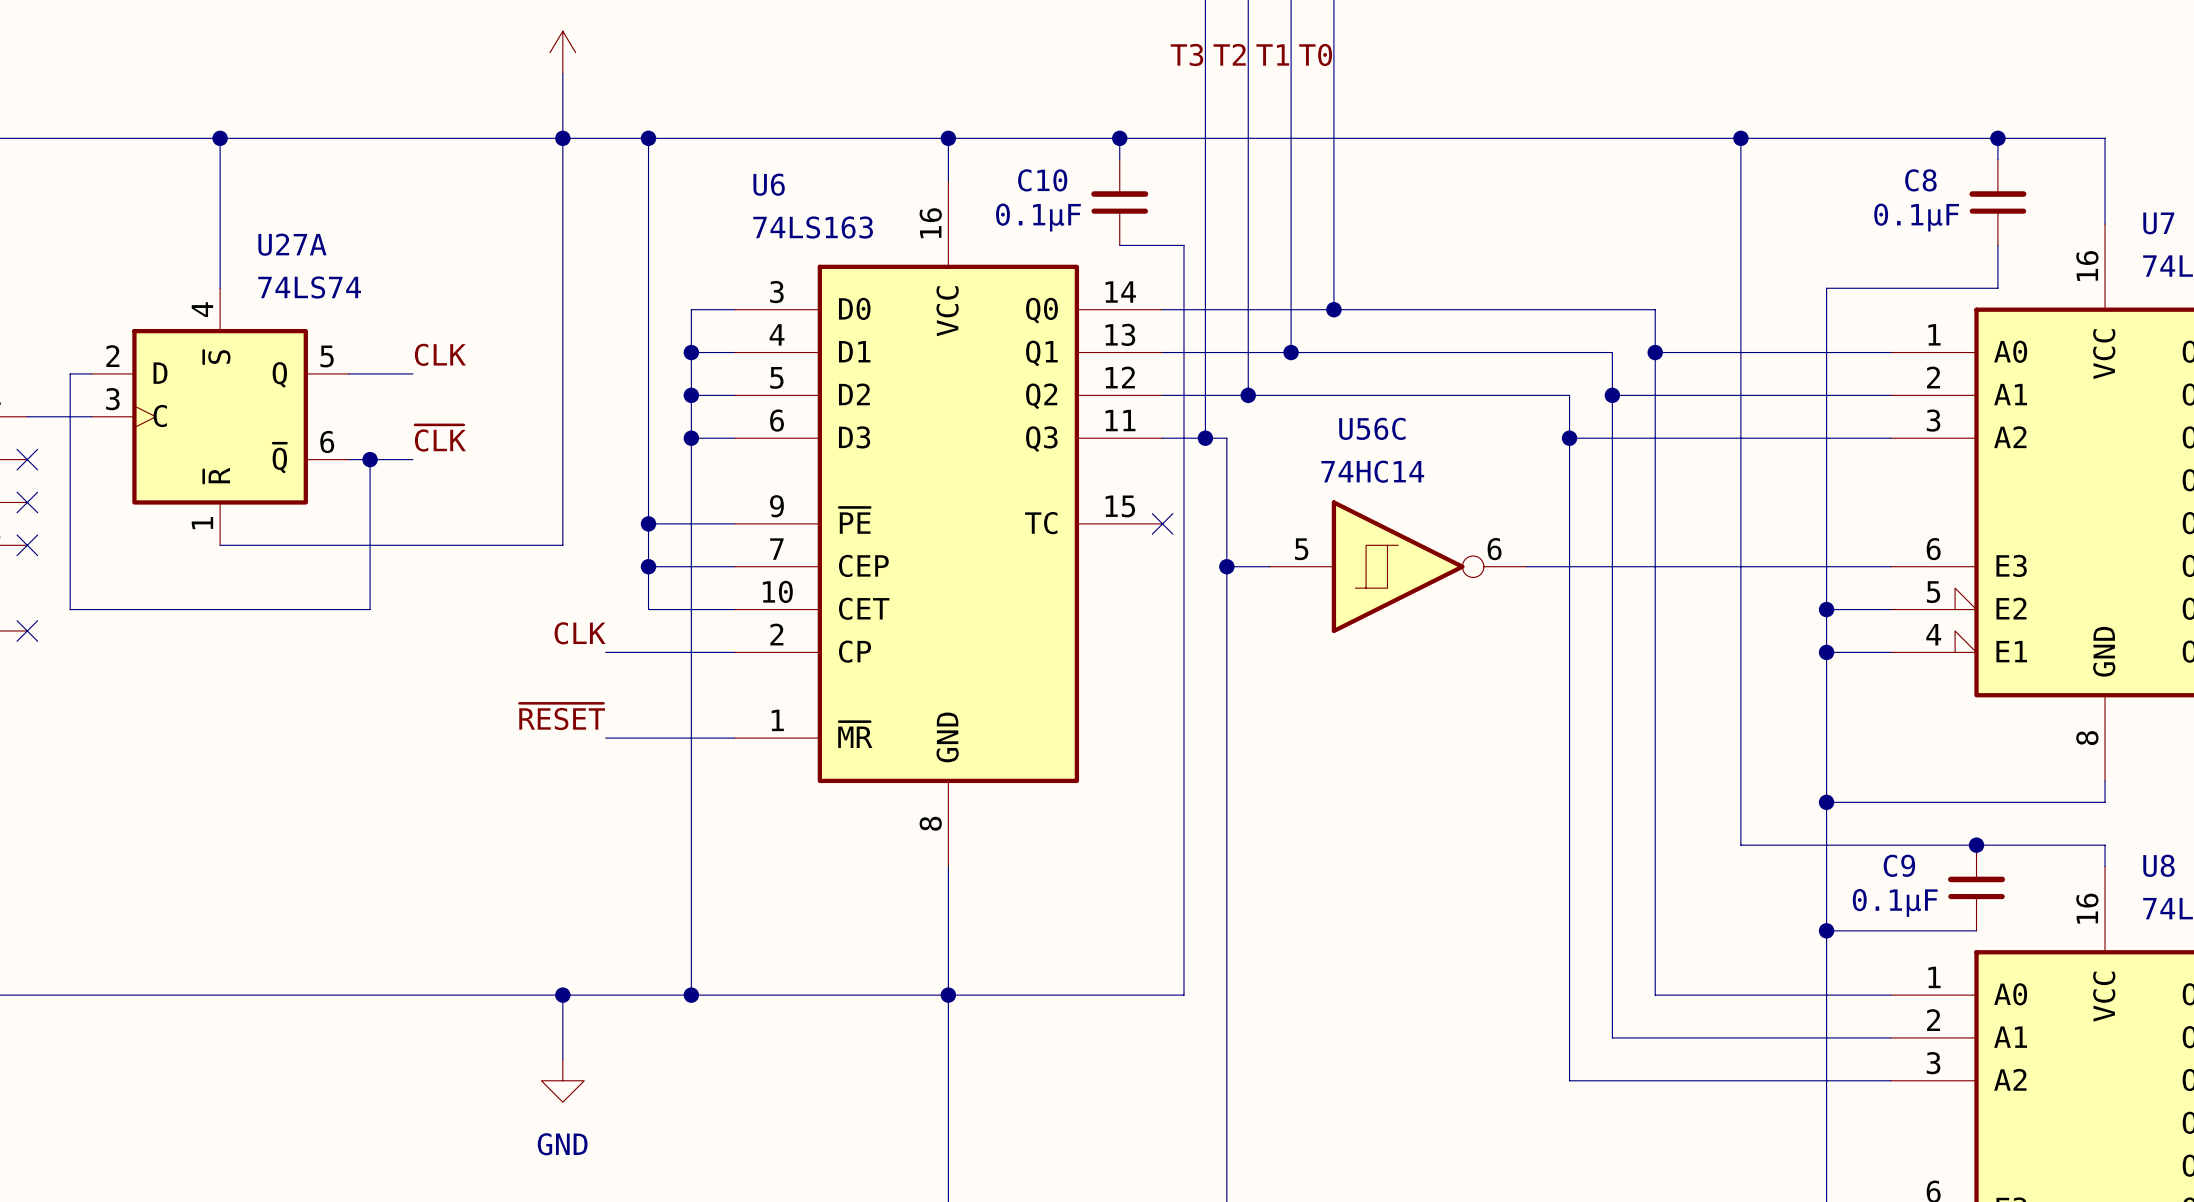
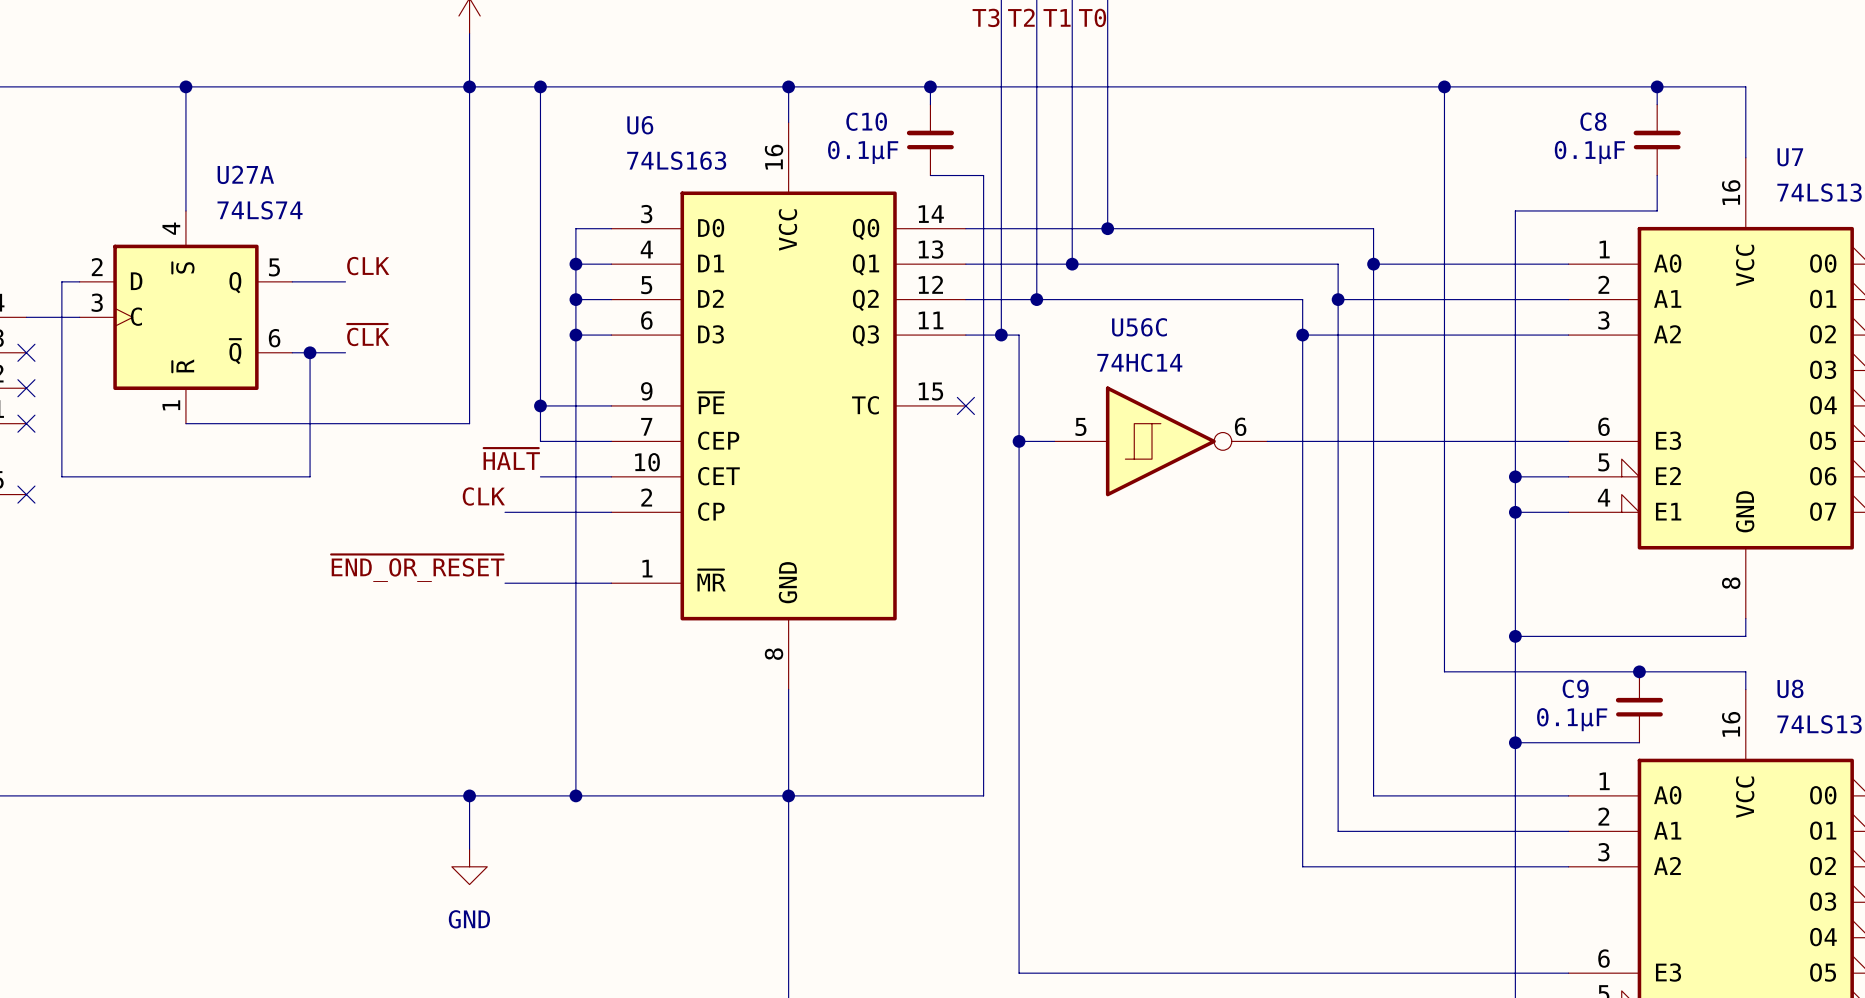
wire: (648, 566) (648, 609) -> none
junction: (648, 566) -> none
label: none -> ~{HALT} (511, 459)
label: ~{RESET} (562, 716) -> ~{END_OR_RESET} (417, 568)

